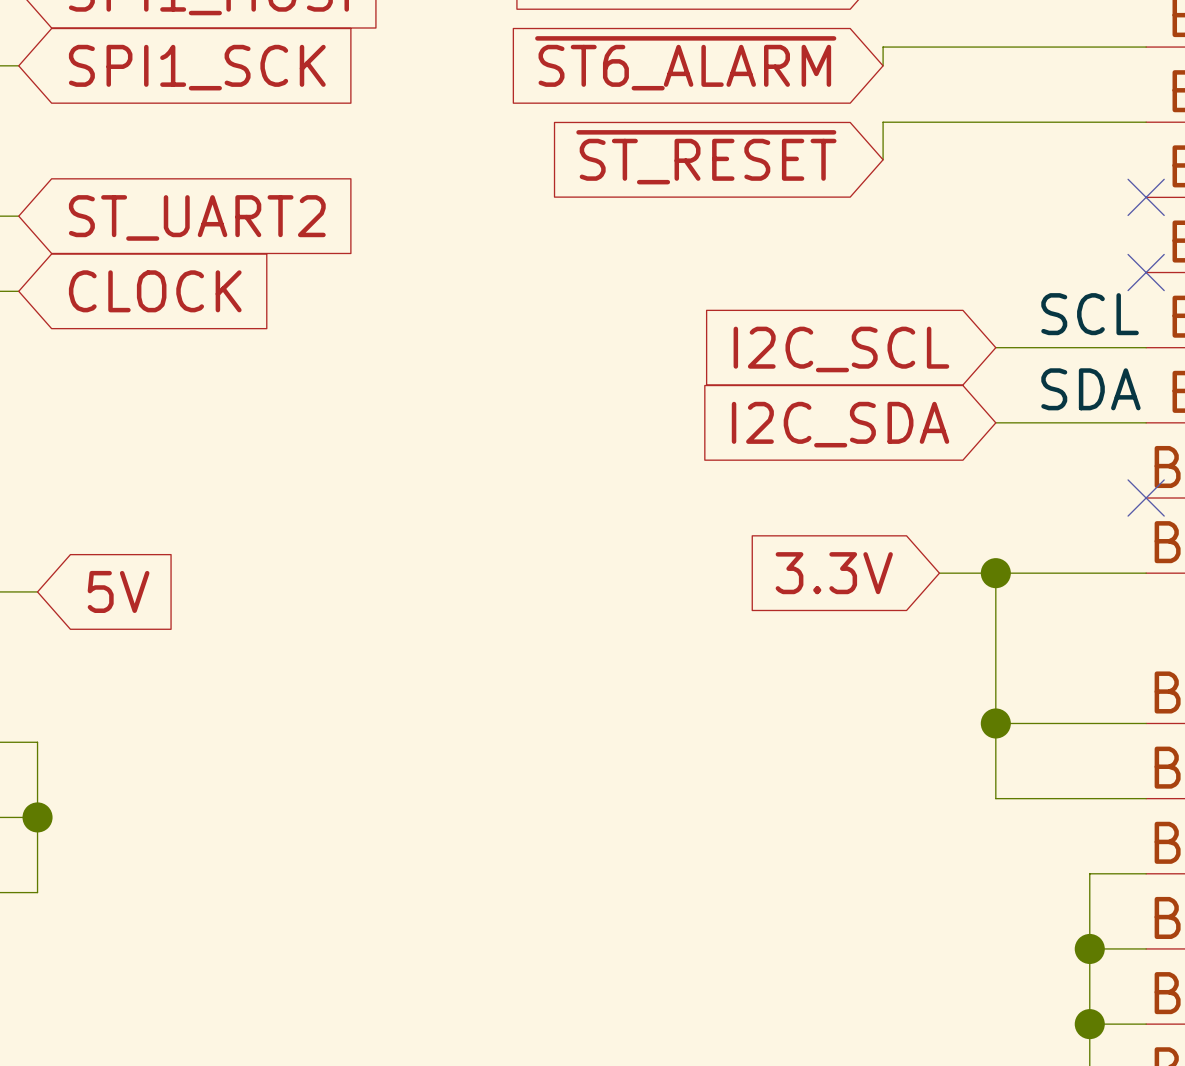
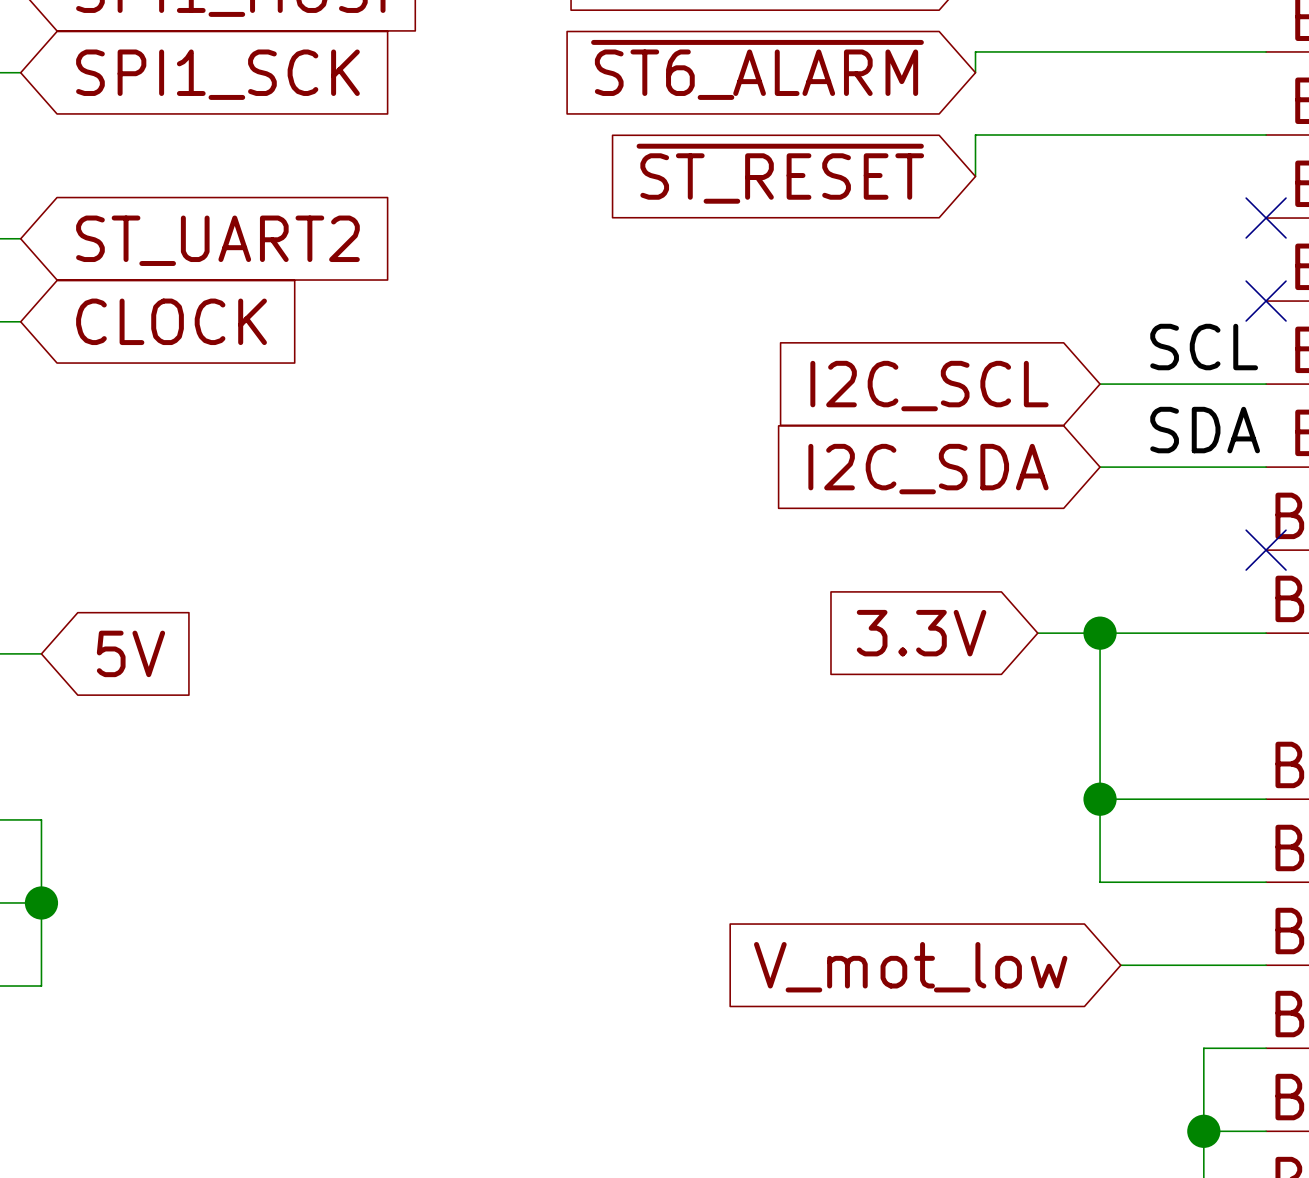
wire: (1089, 873) (1089, 948) -> (1203, 965) (1120, 965)
global label: none -> V_mot_low (910, 967)
junction: (1089, 948) -> none

